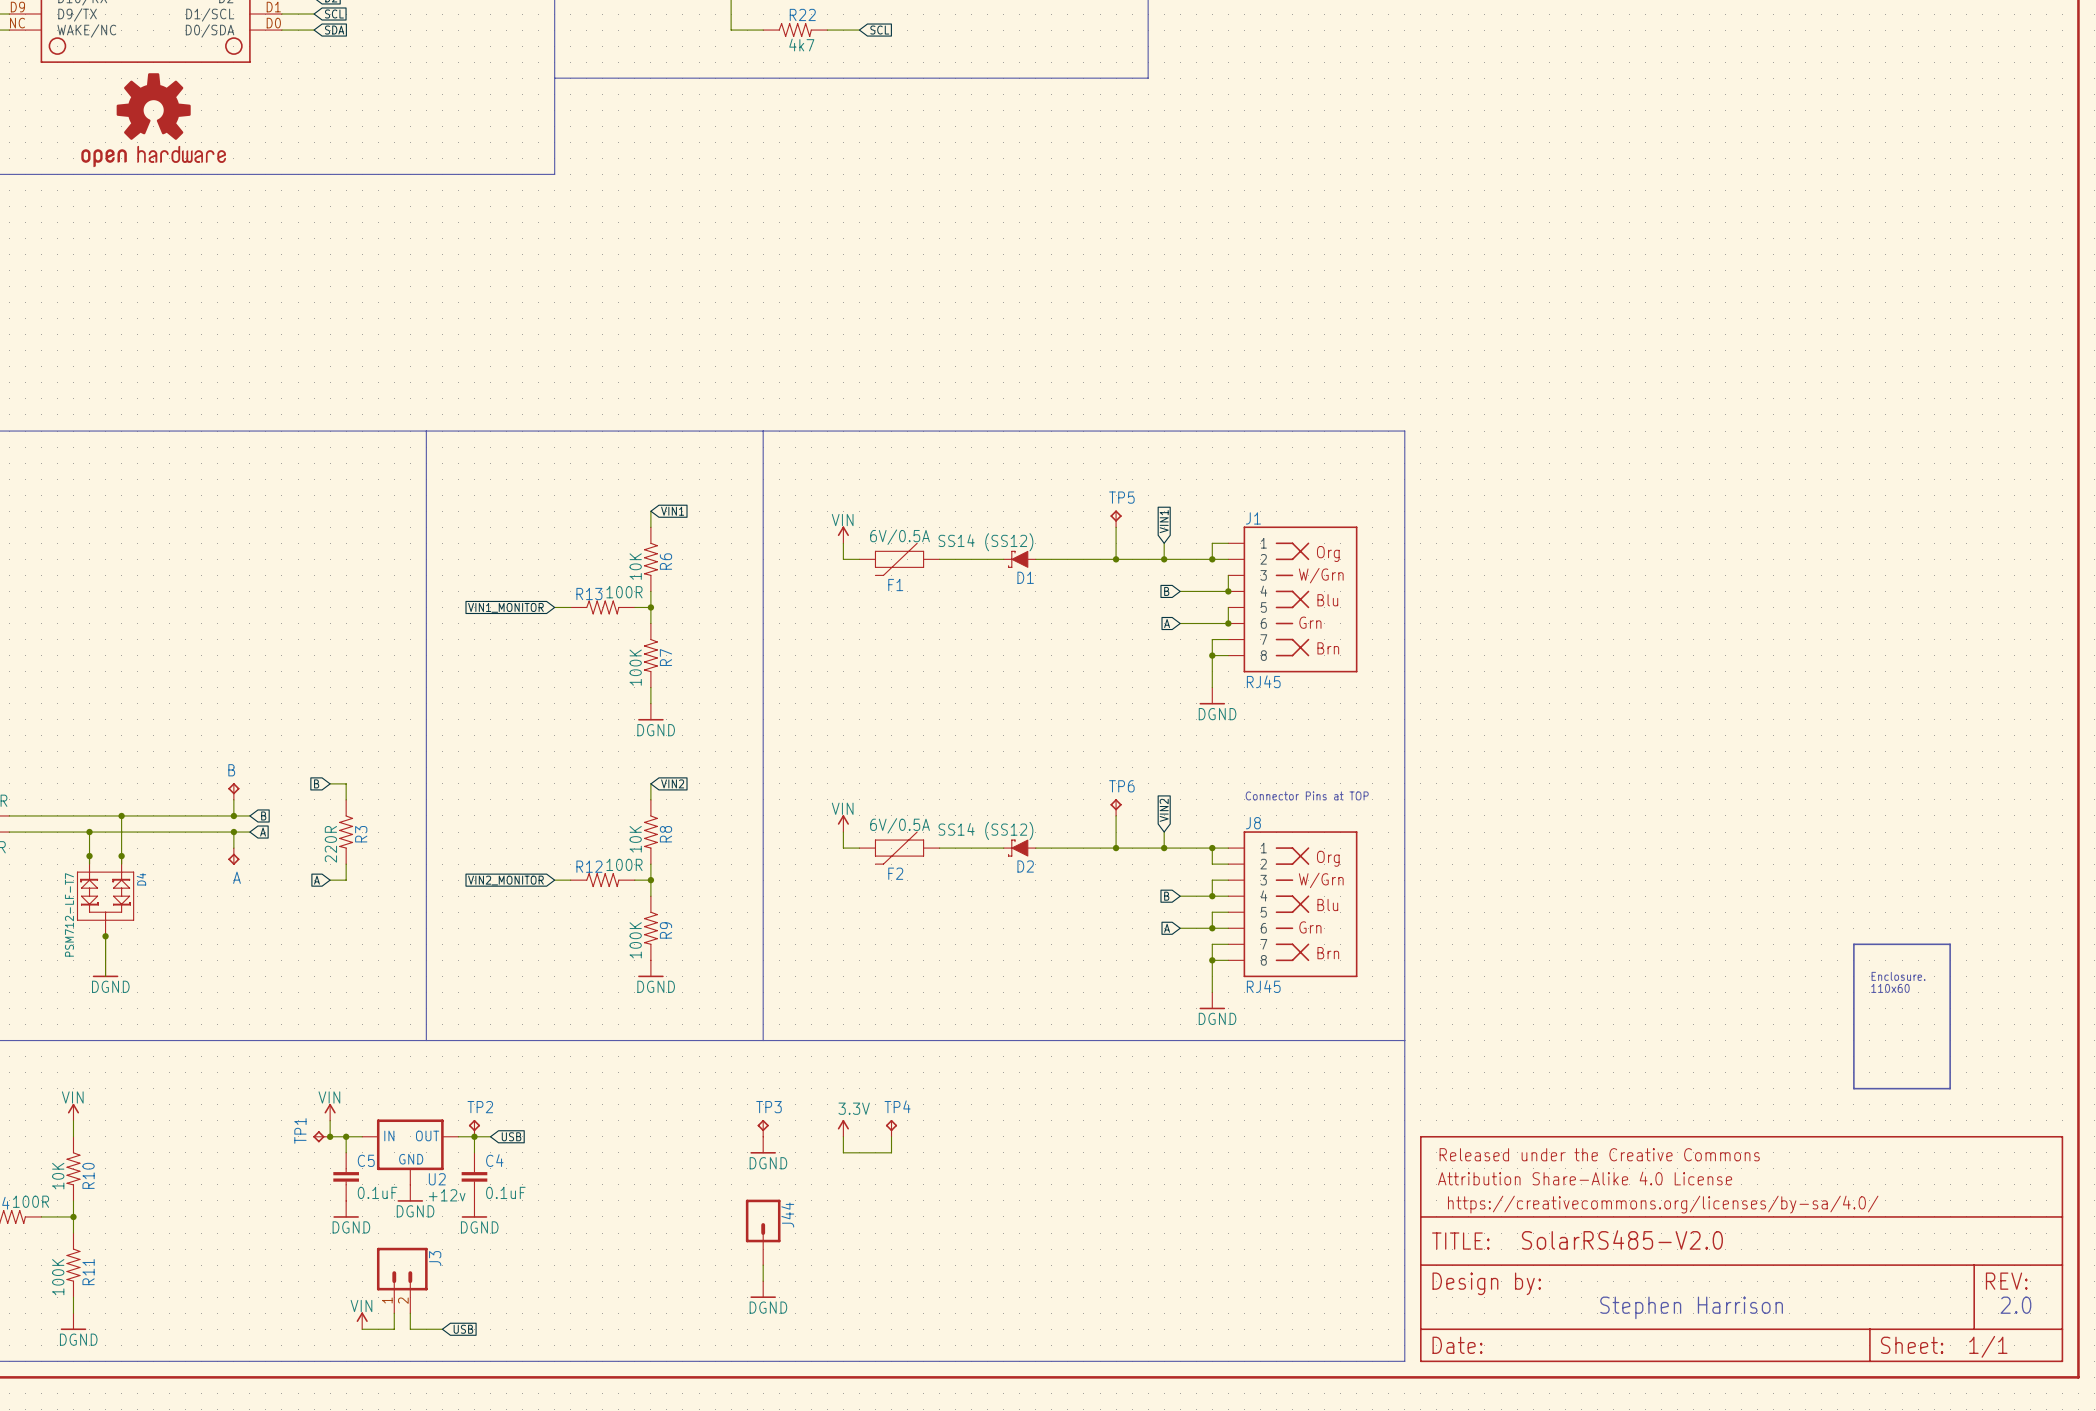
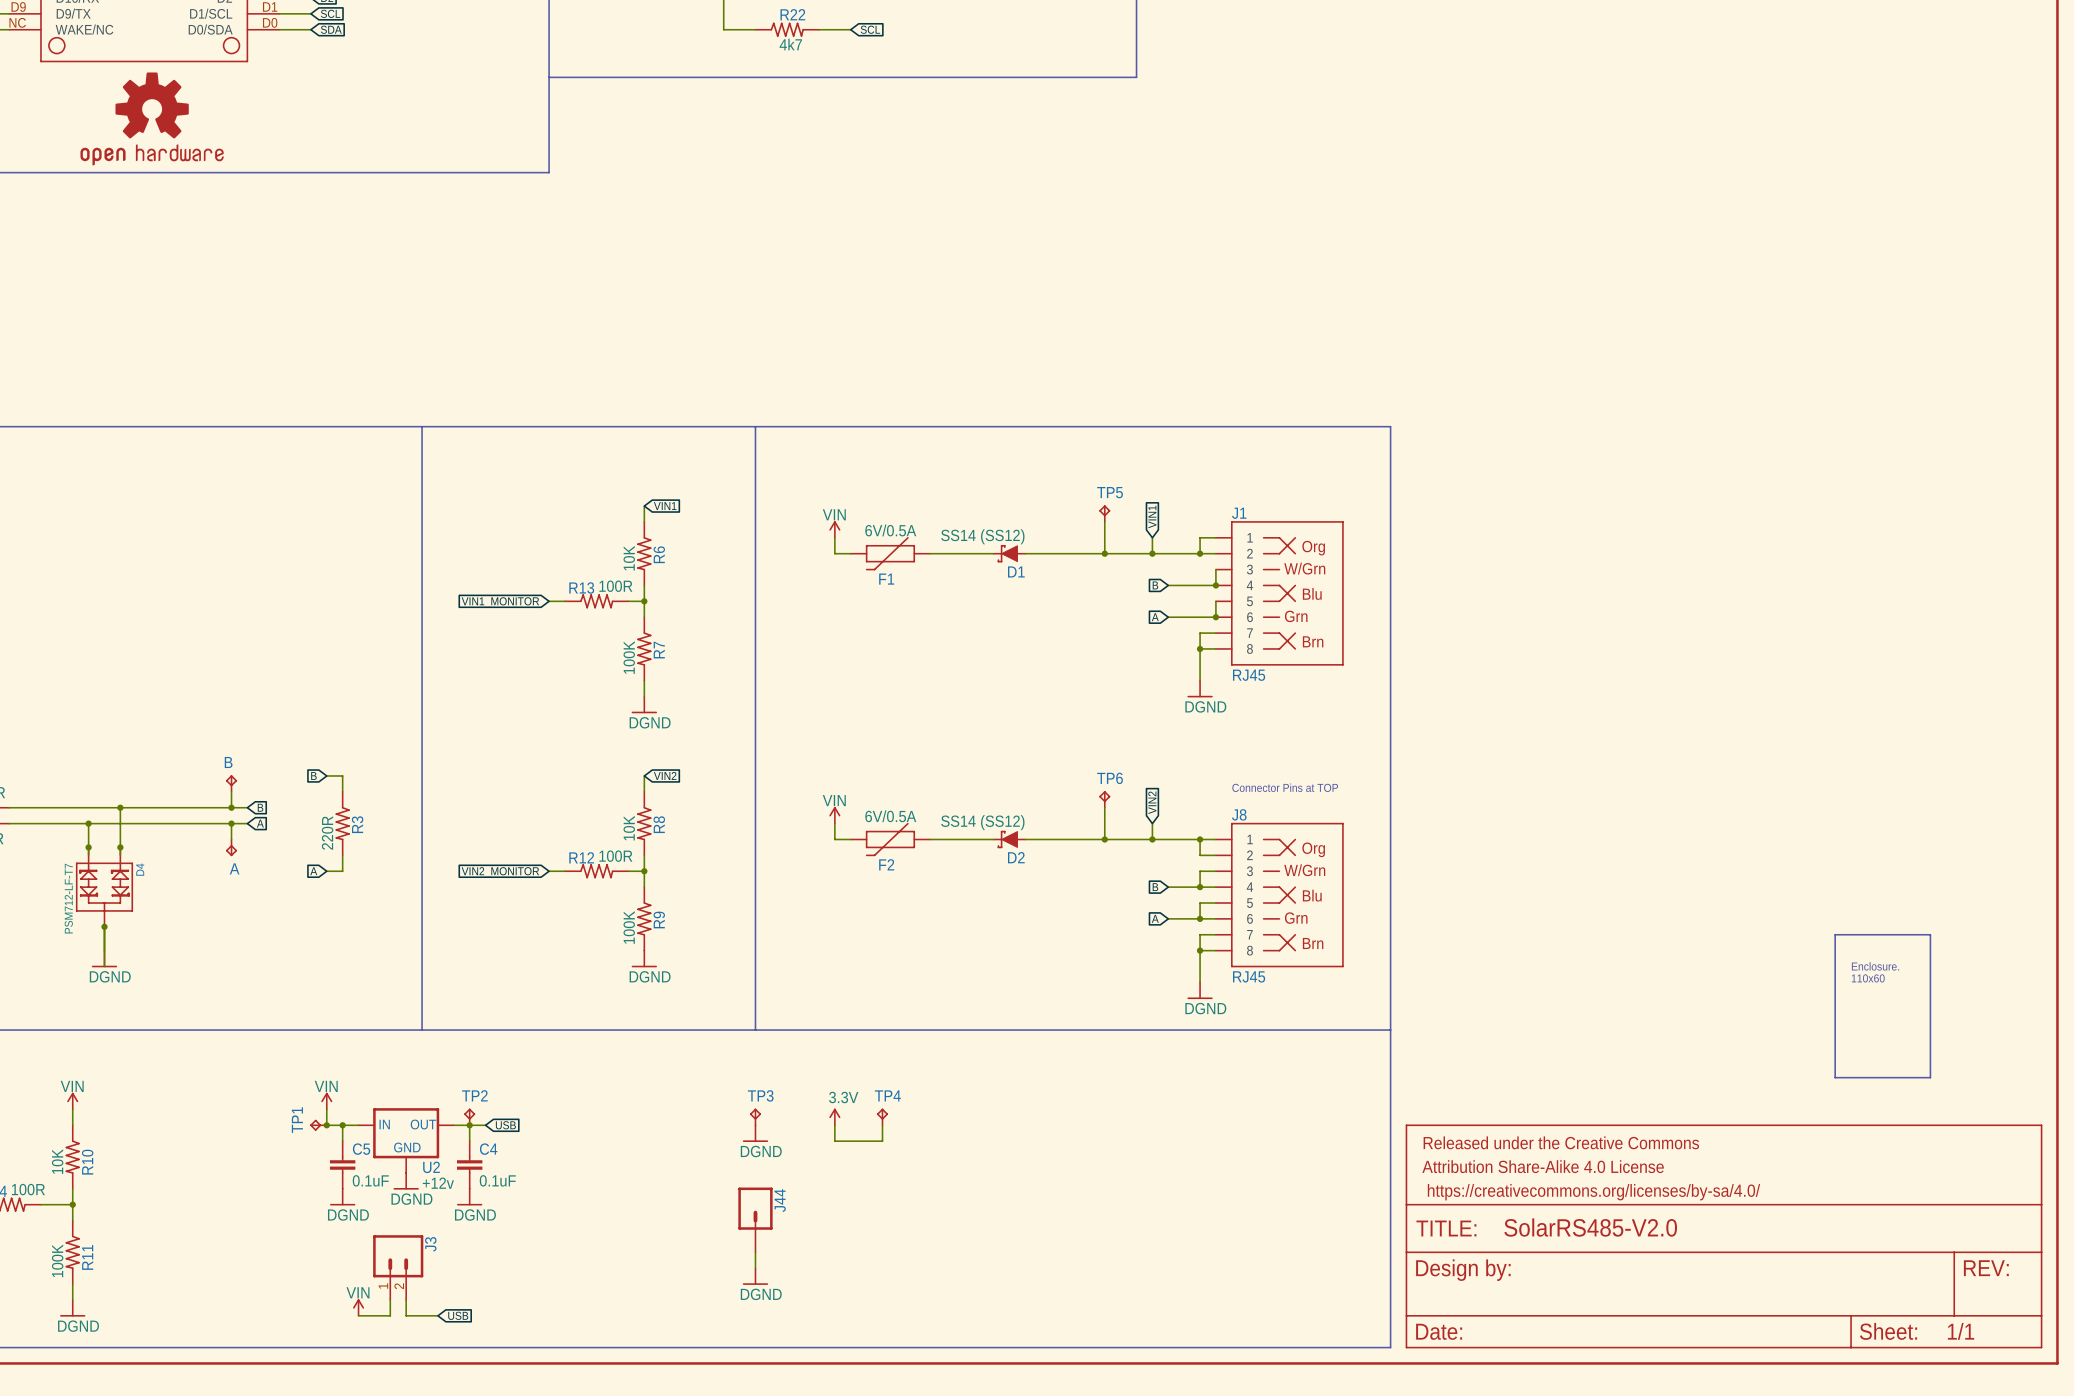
text: 2.0 (2015, 1305) -> none
text: Stephen Harrison (1691, 1307) -> none

